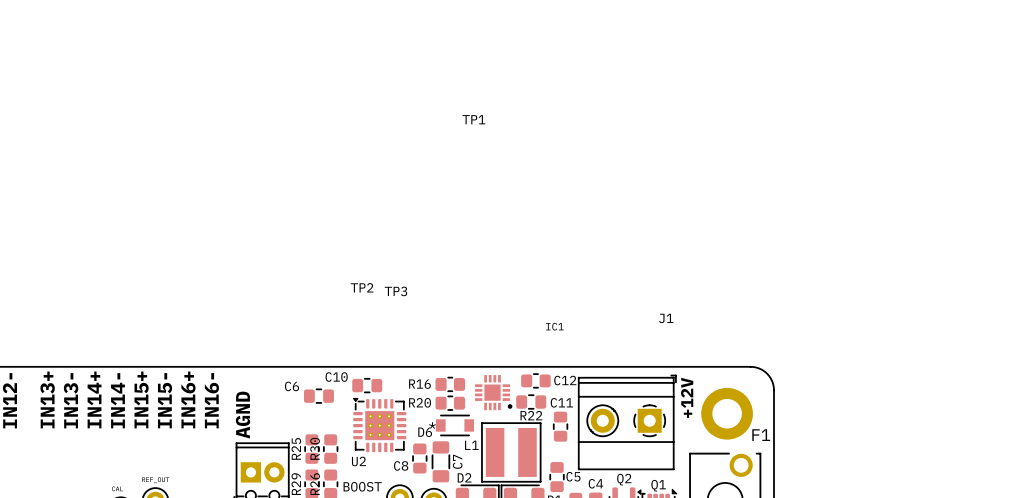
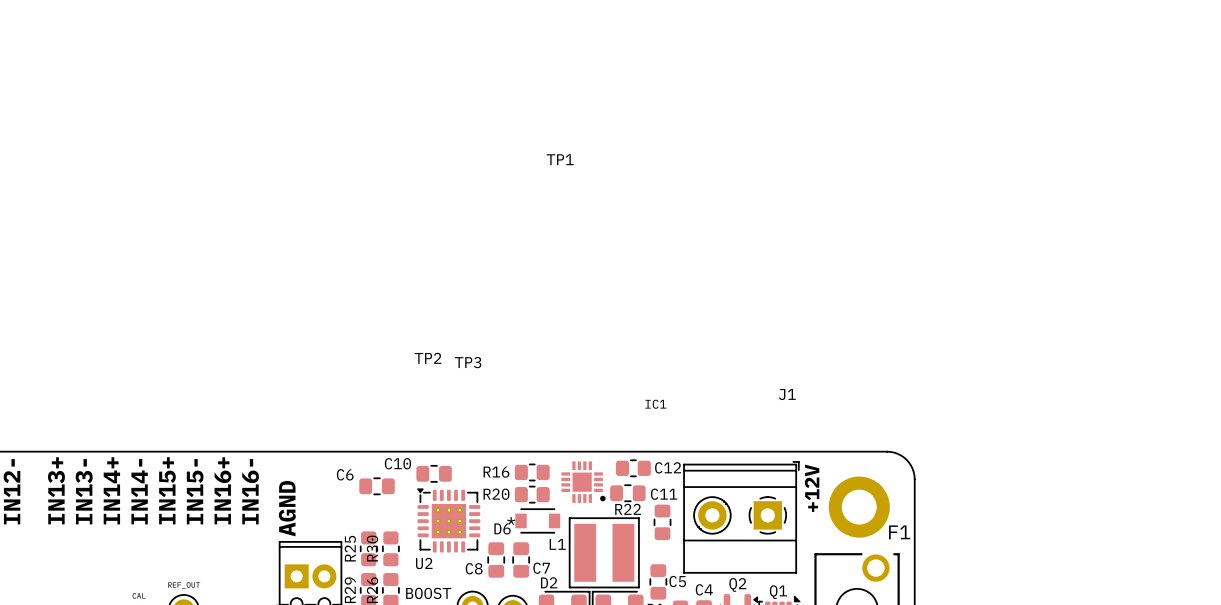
C7 footprint: [431, 441, 450, 483] -> [512, 542, 530, 578]
C7 name rotation: 0° (457, 461) -> 90° clockwise (541, 568)

